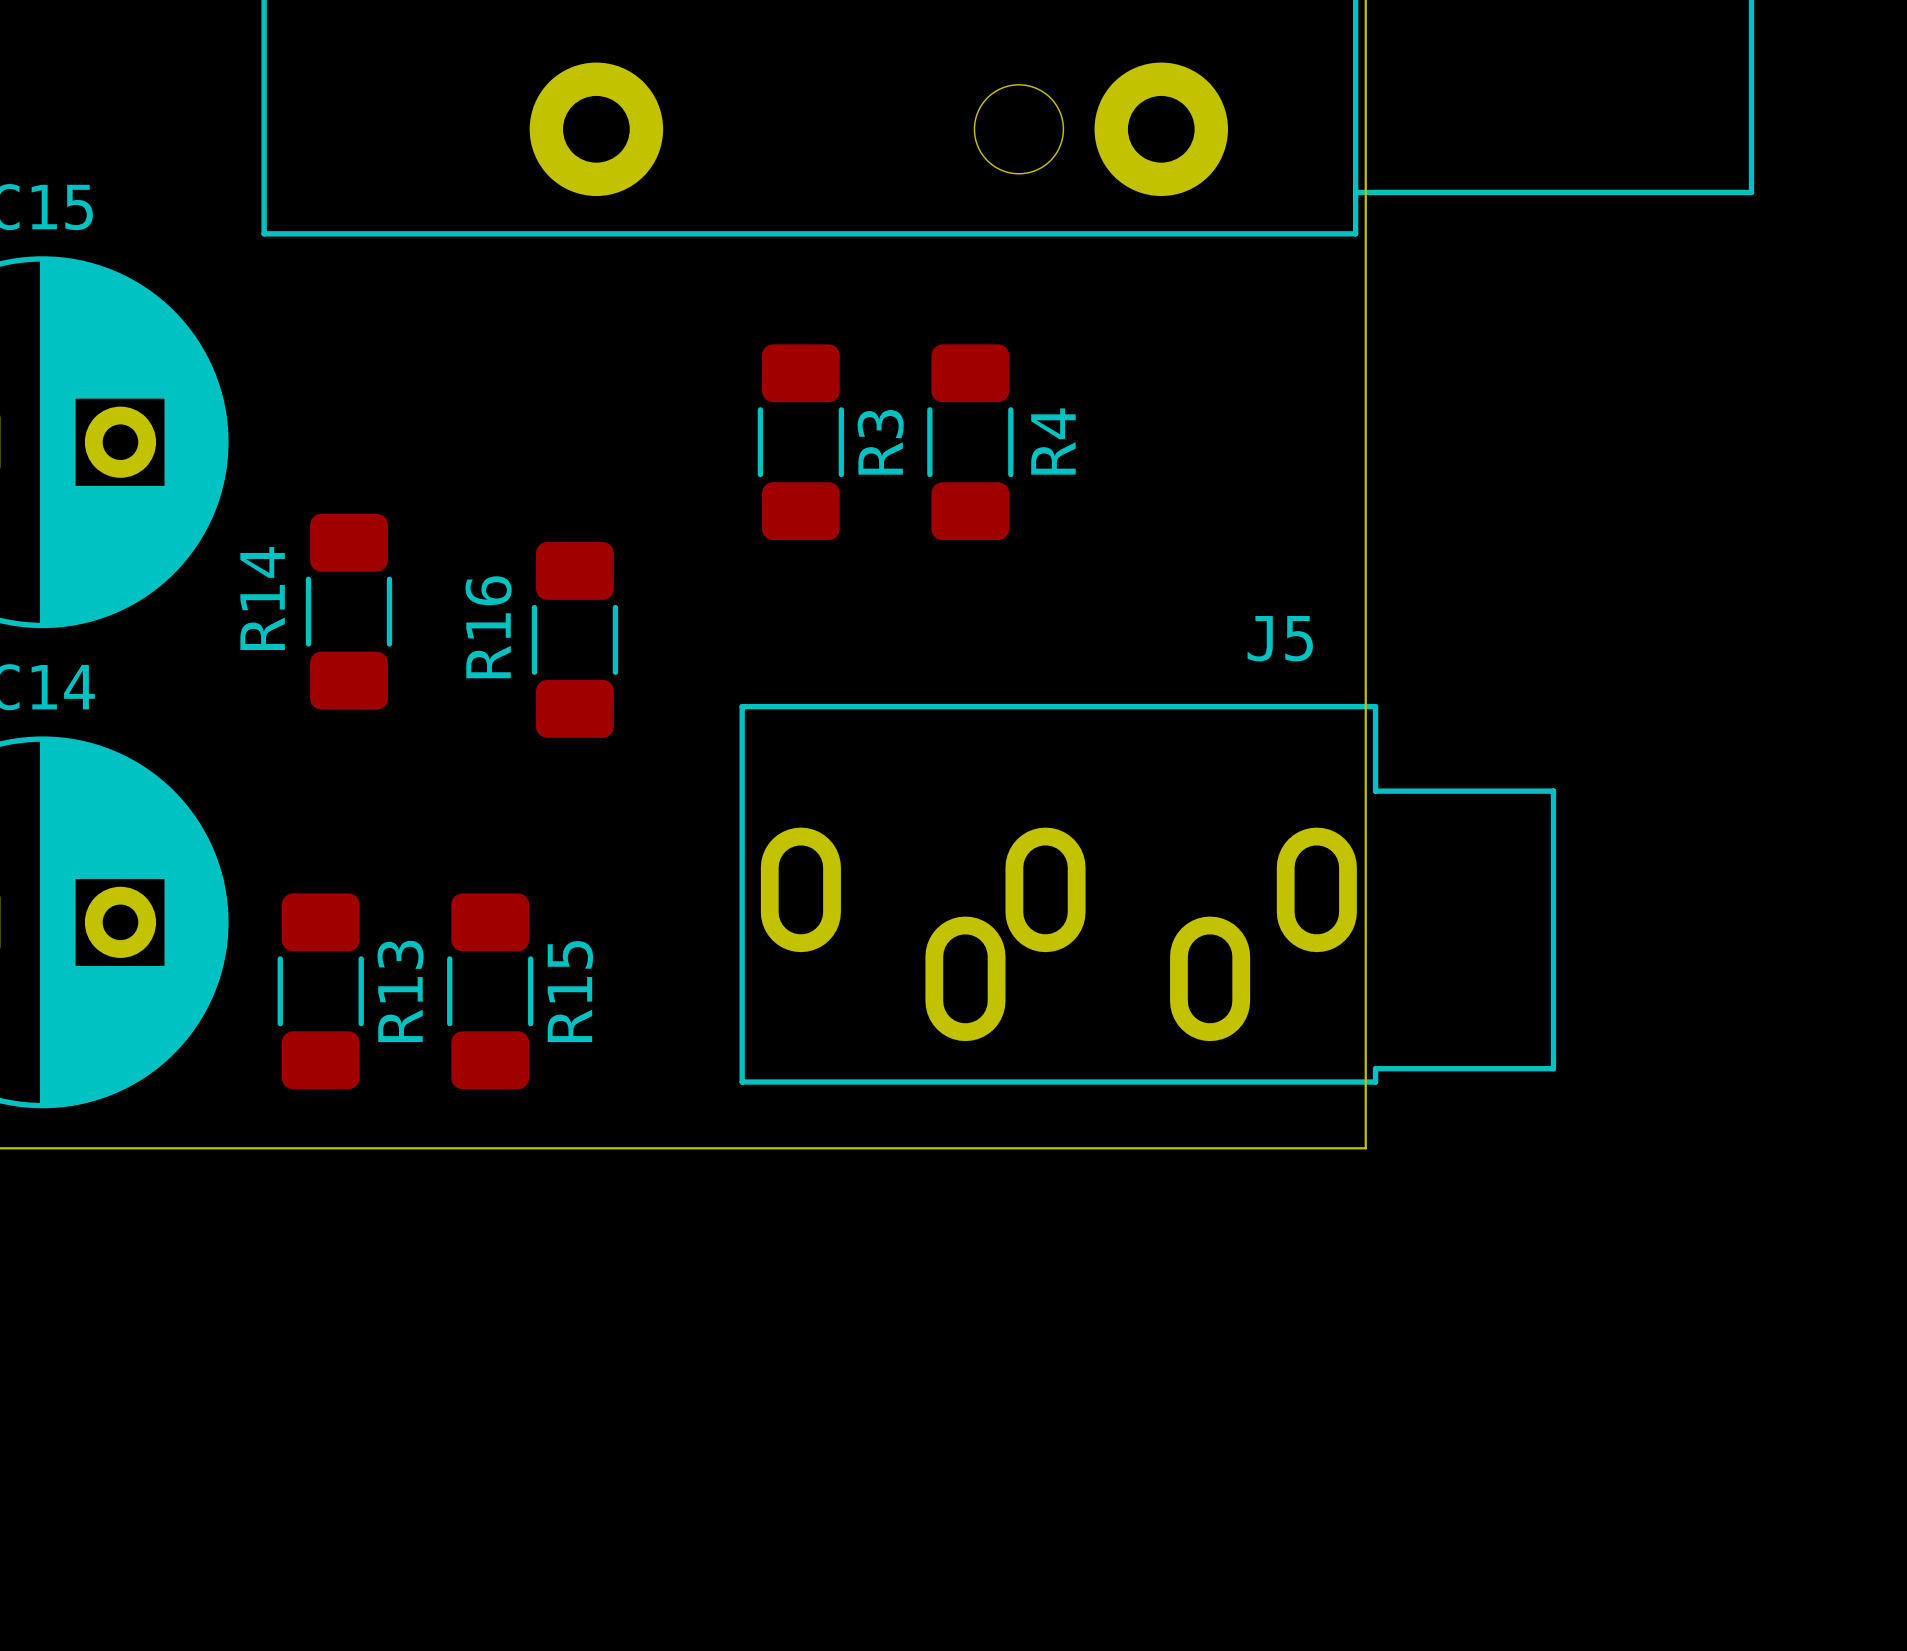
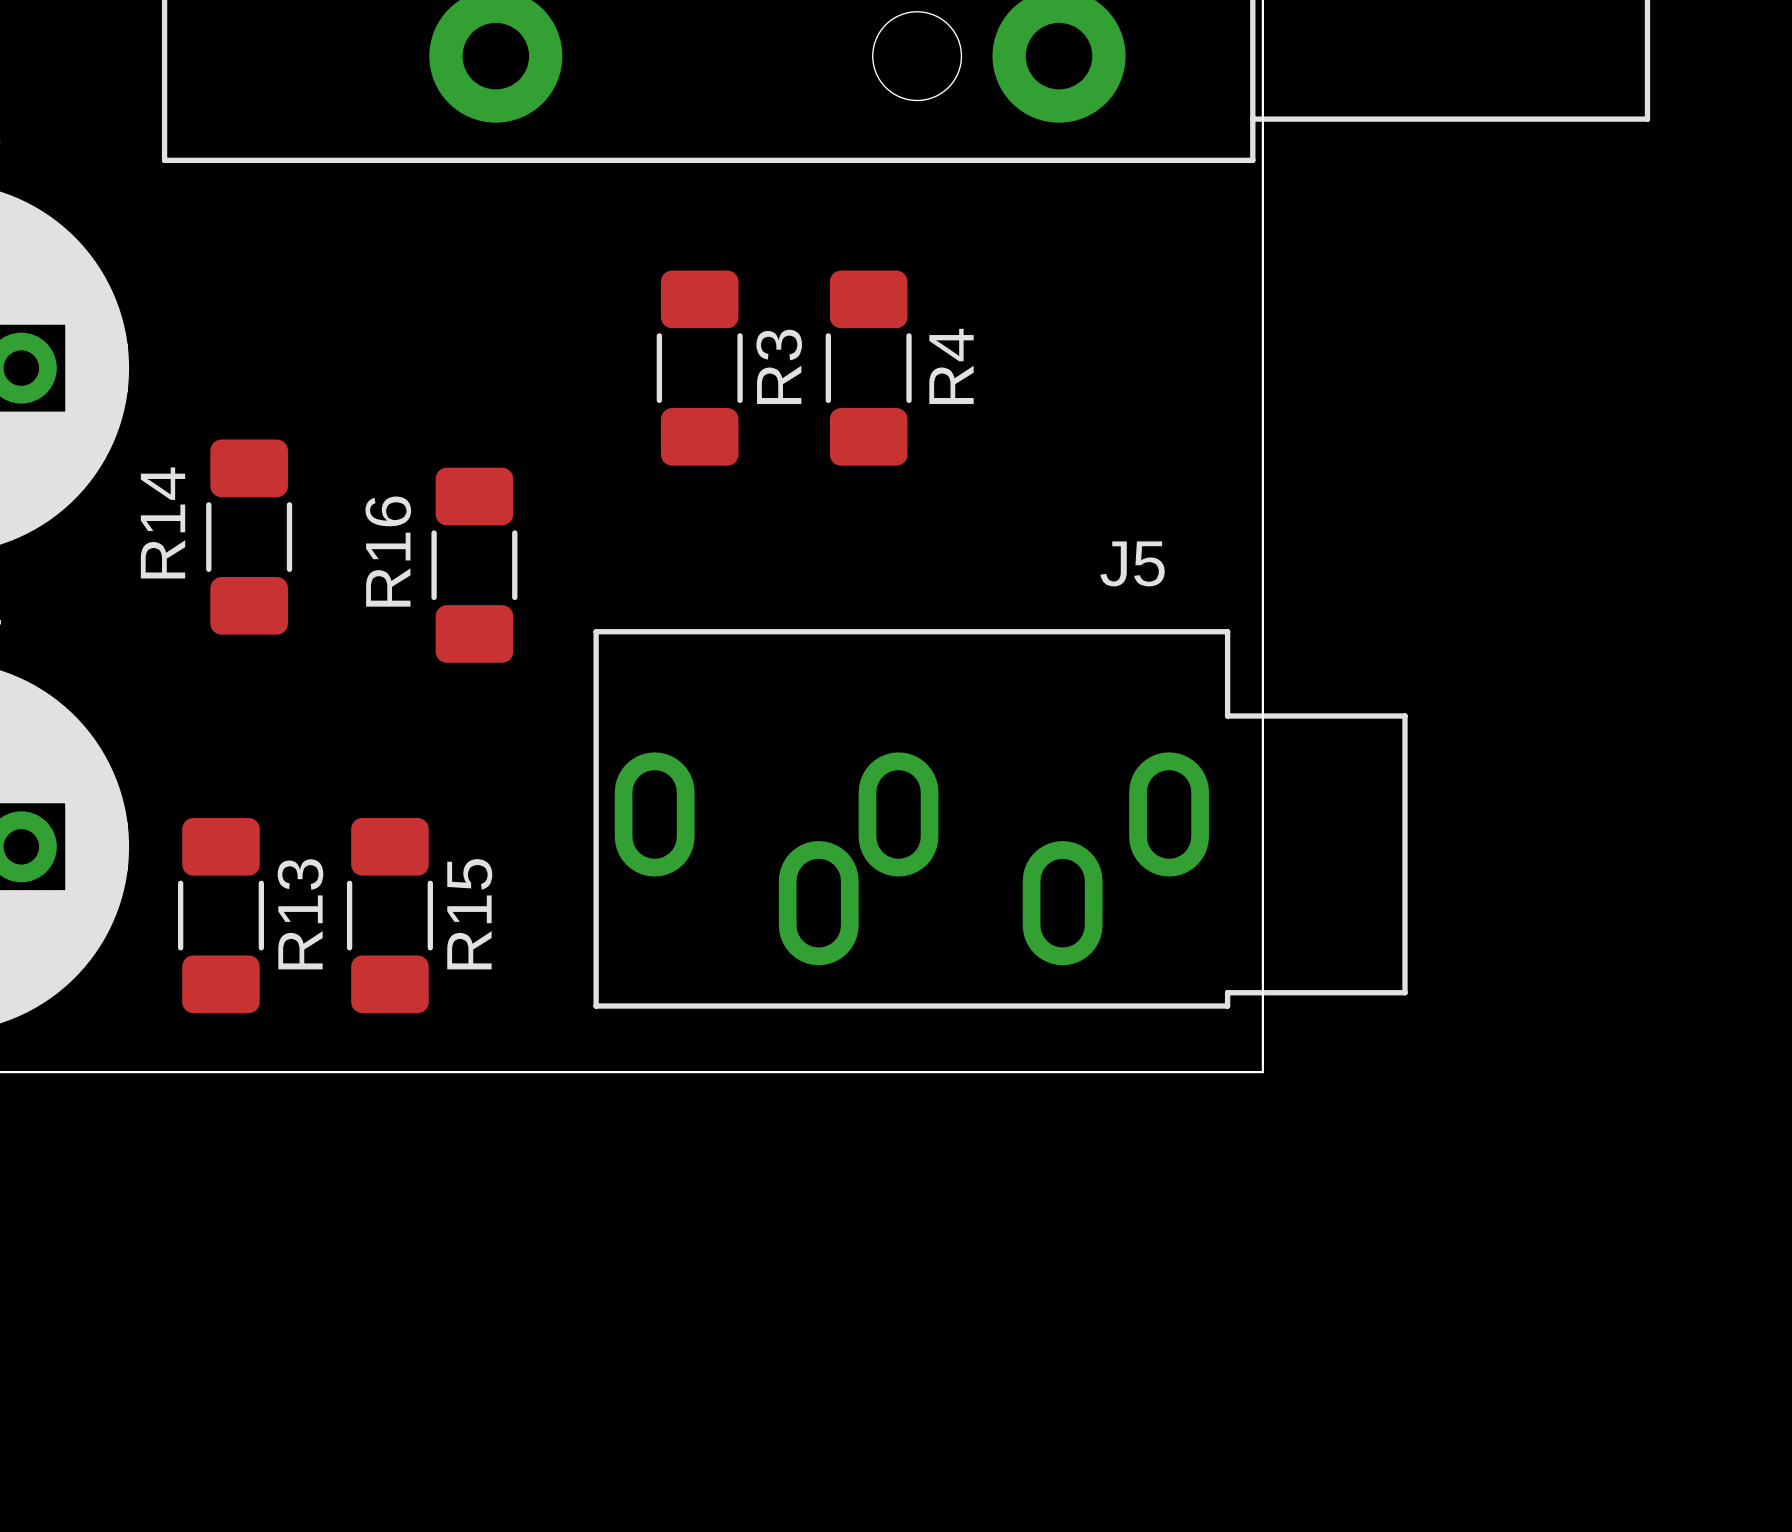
J5 position: (1147, 894) -> (1000, 818)

